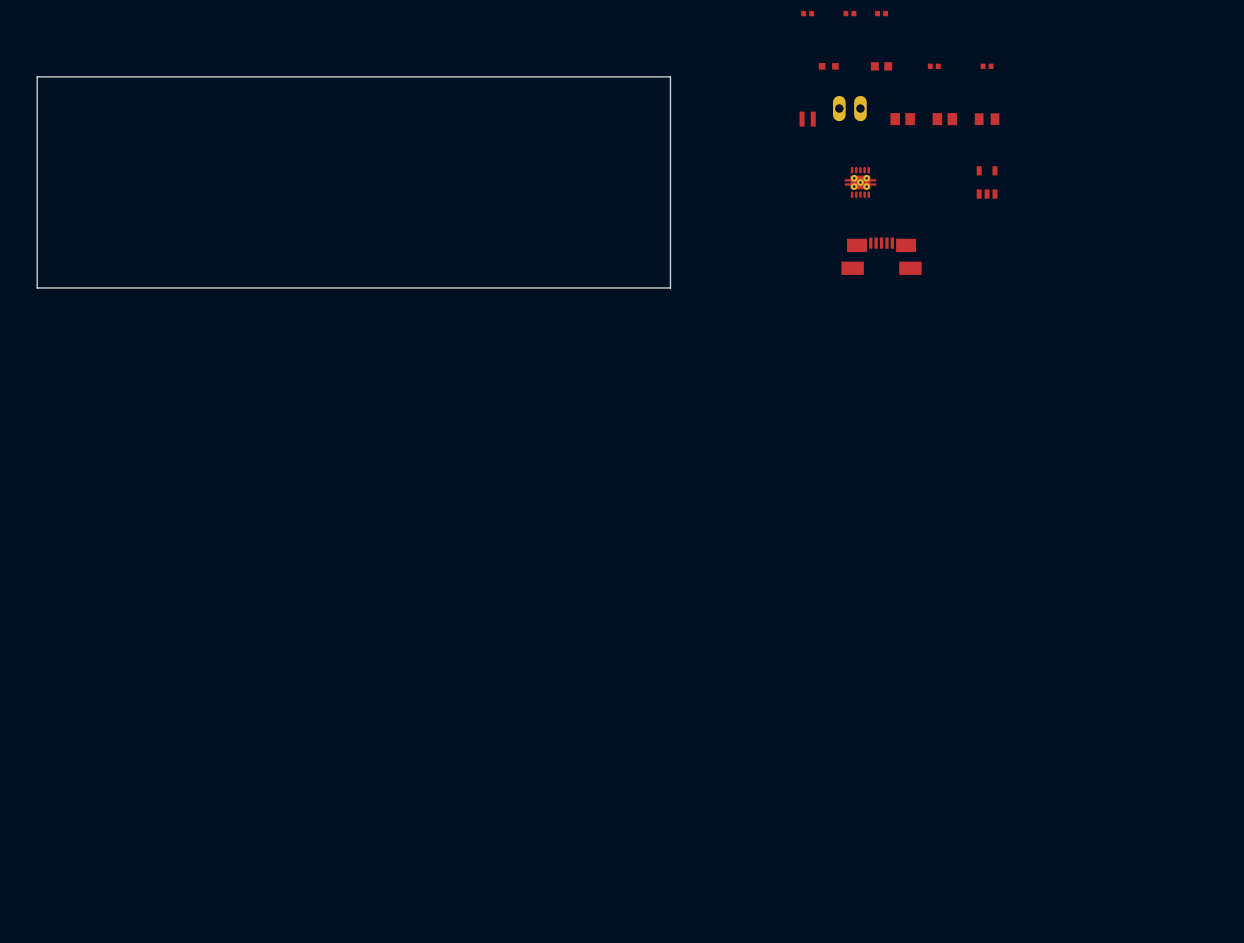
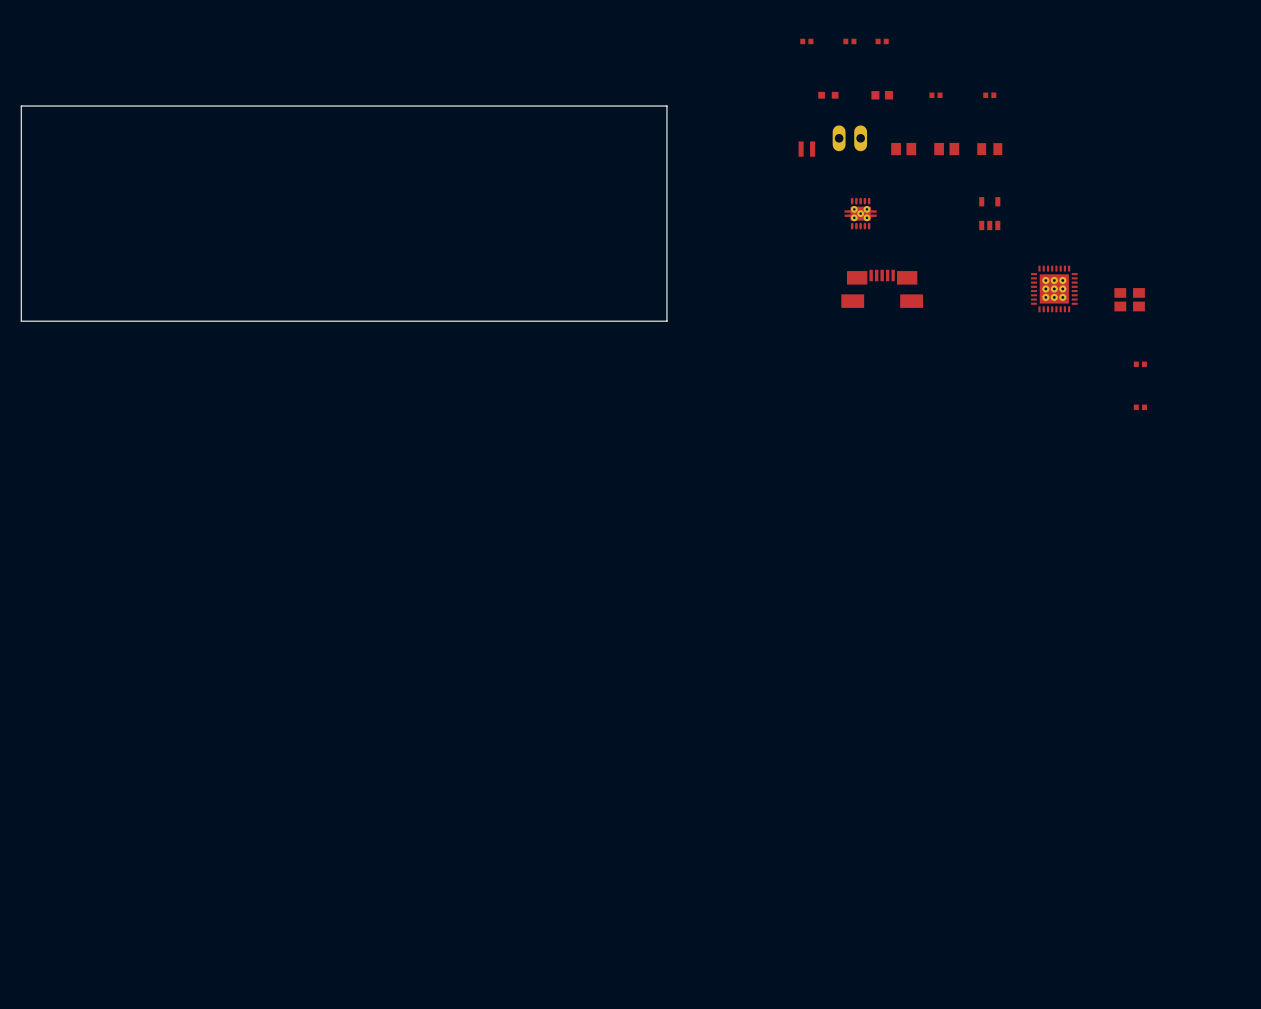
part: none -> (1054, 288)
part: none -> (1129, 299)
part: none -> (1140, 364)
part: none -> (1140, 407)

